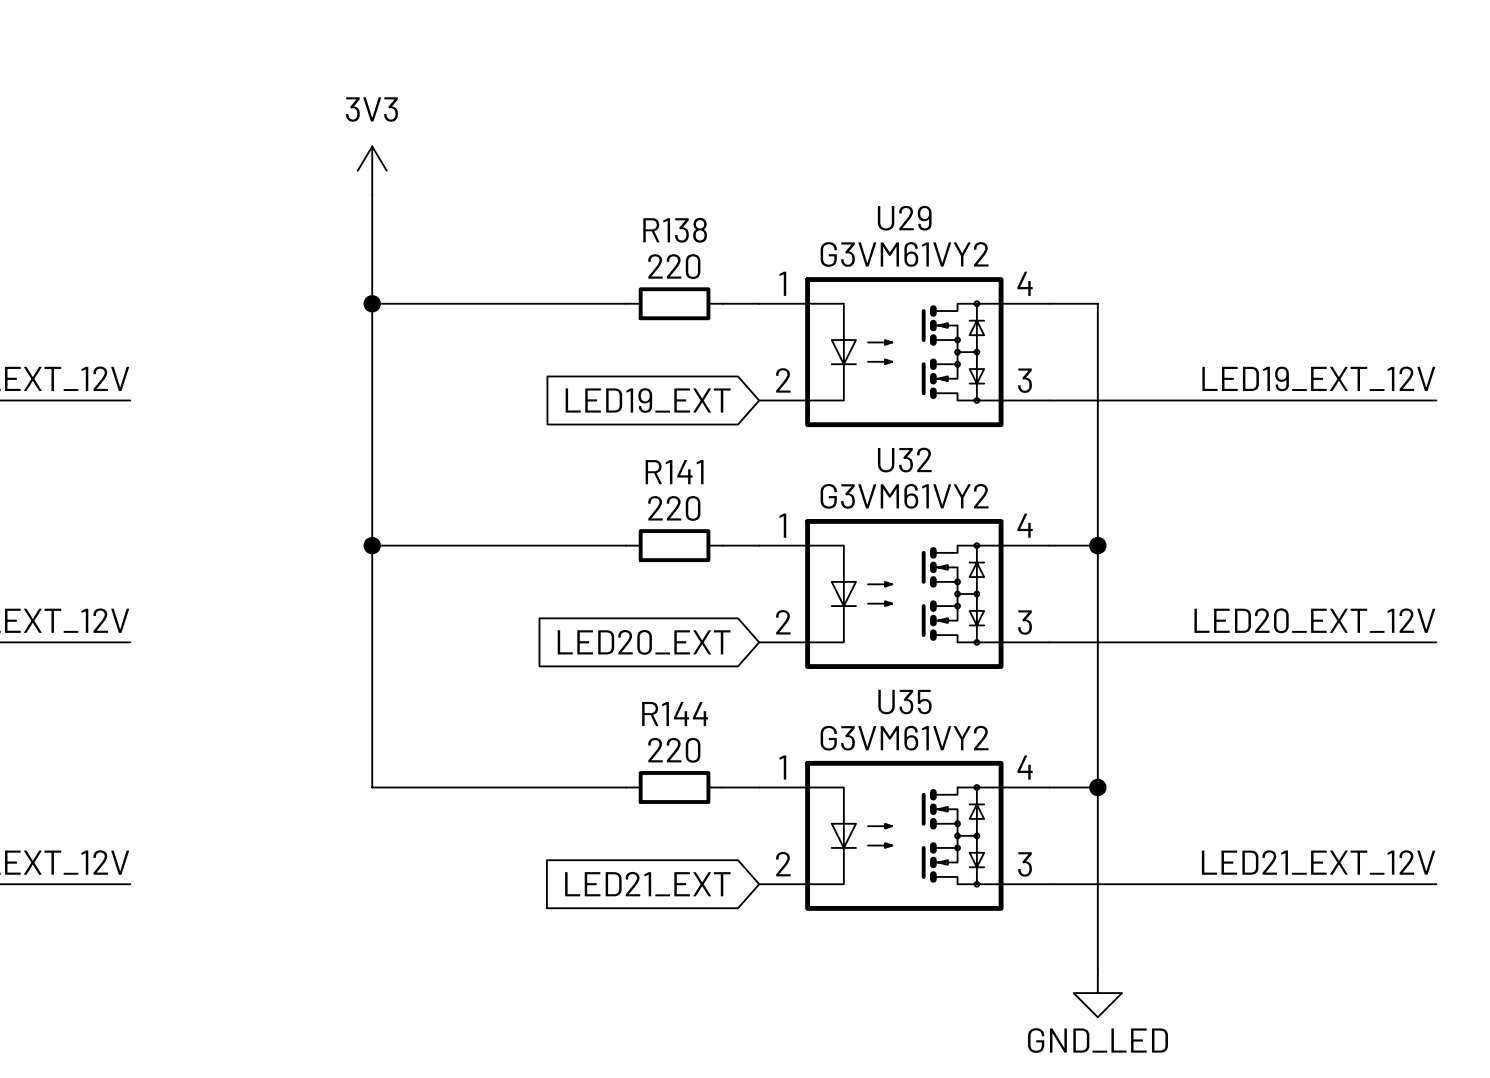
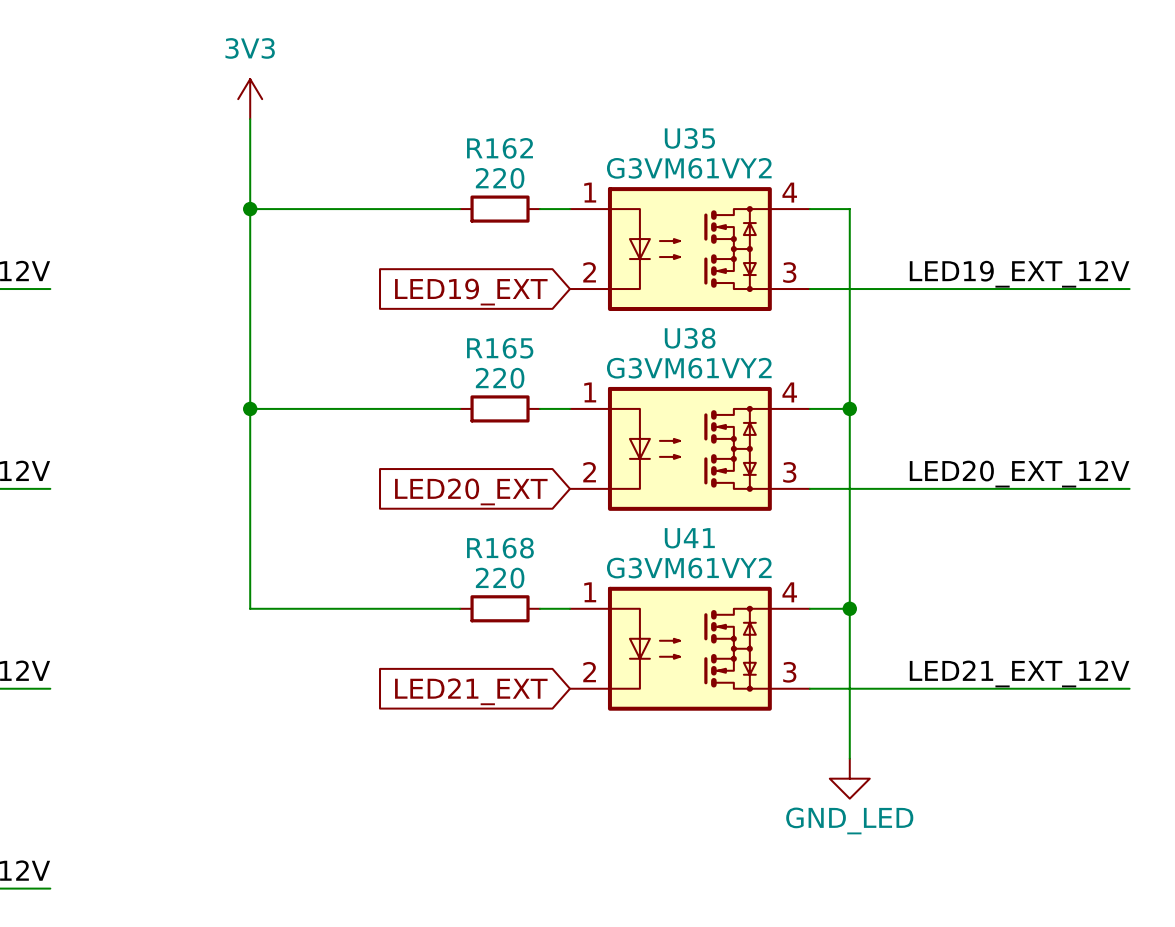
U29 name: U29 (904, 218) -> U35 (689, 138)
R138 name: R138 (675, 230) -> R162 (500, 148)
U32 name: U32 (904, 460) -> U38 (690, 338)
R141 name: R141 (674, 472) -> R165 (500, 348)
U35 name: U35 (904, 702) -> U41 (689, 538)
R144 name: R144 (675, 714) -> R168 (500, 548)

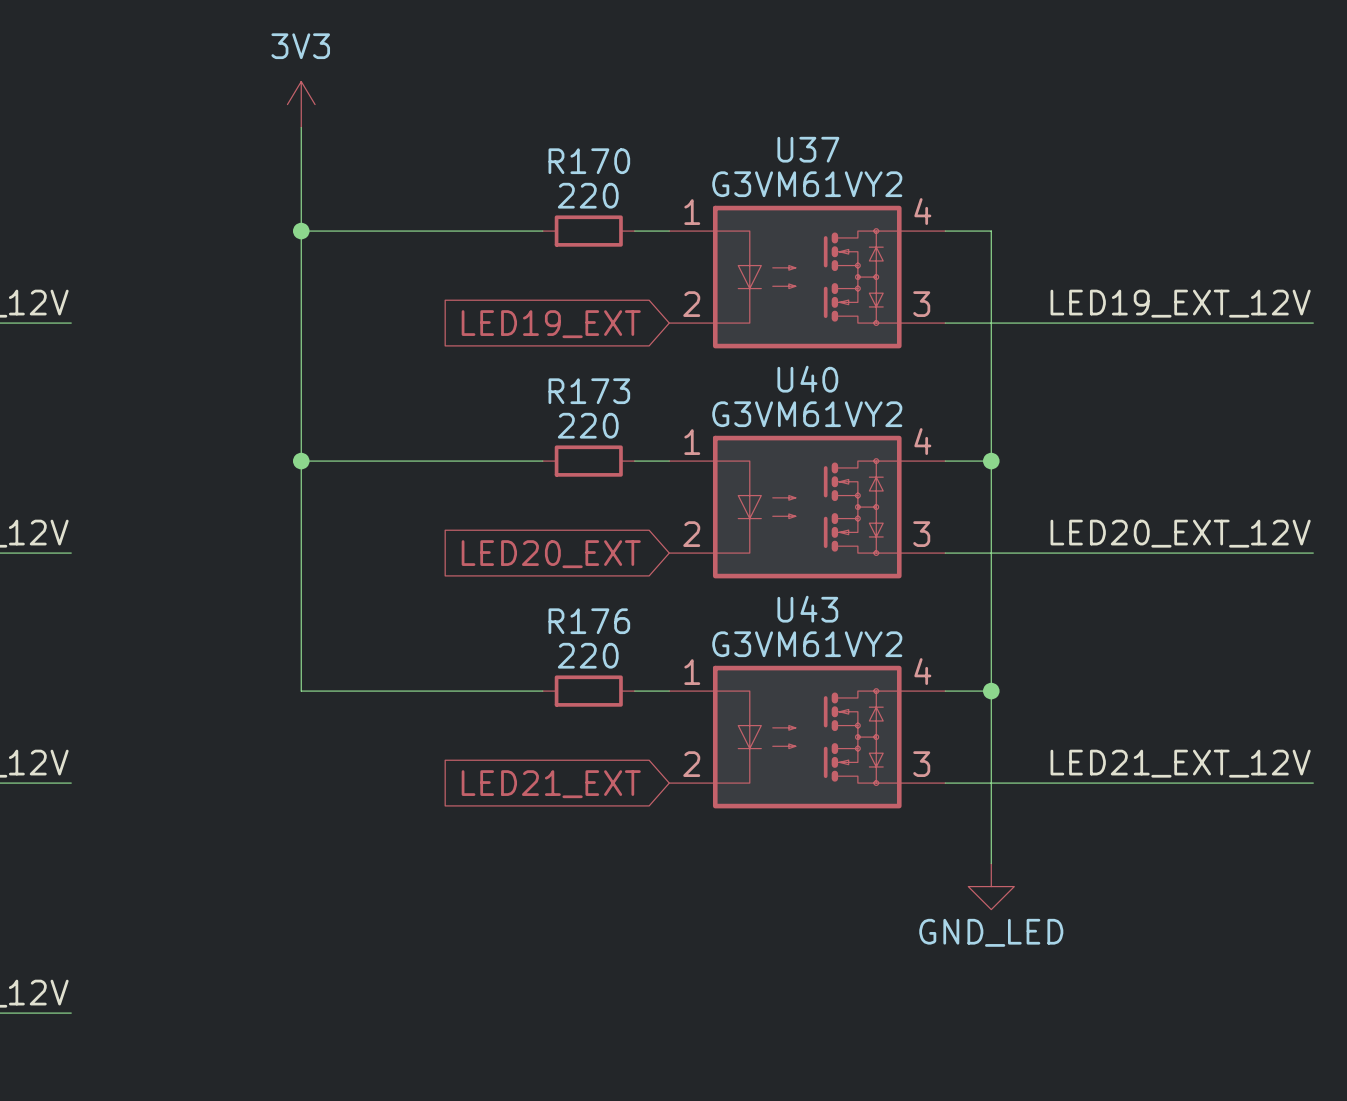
U35 name: U35 (689, 138) -> U37 (808, 149)
R162 name: R162 (500, 148) -> R170 (589, 161)
U38 name: U38 (690, 338) -> U40 (807, 379)
R165 name: R165 (500, 348) -> R173 (589, 391)
U41 name: U41 (689, 538) -> U43 (807, 609)
R168 name: R168 (500, 548) -> R176 (589, 621)

